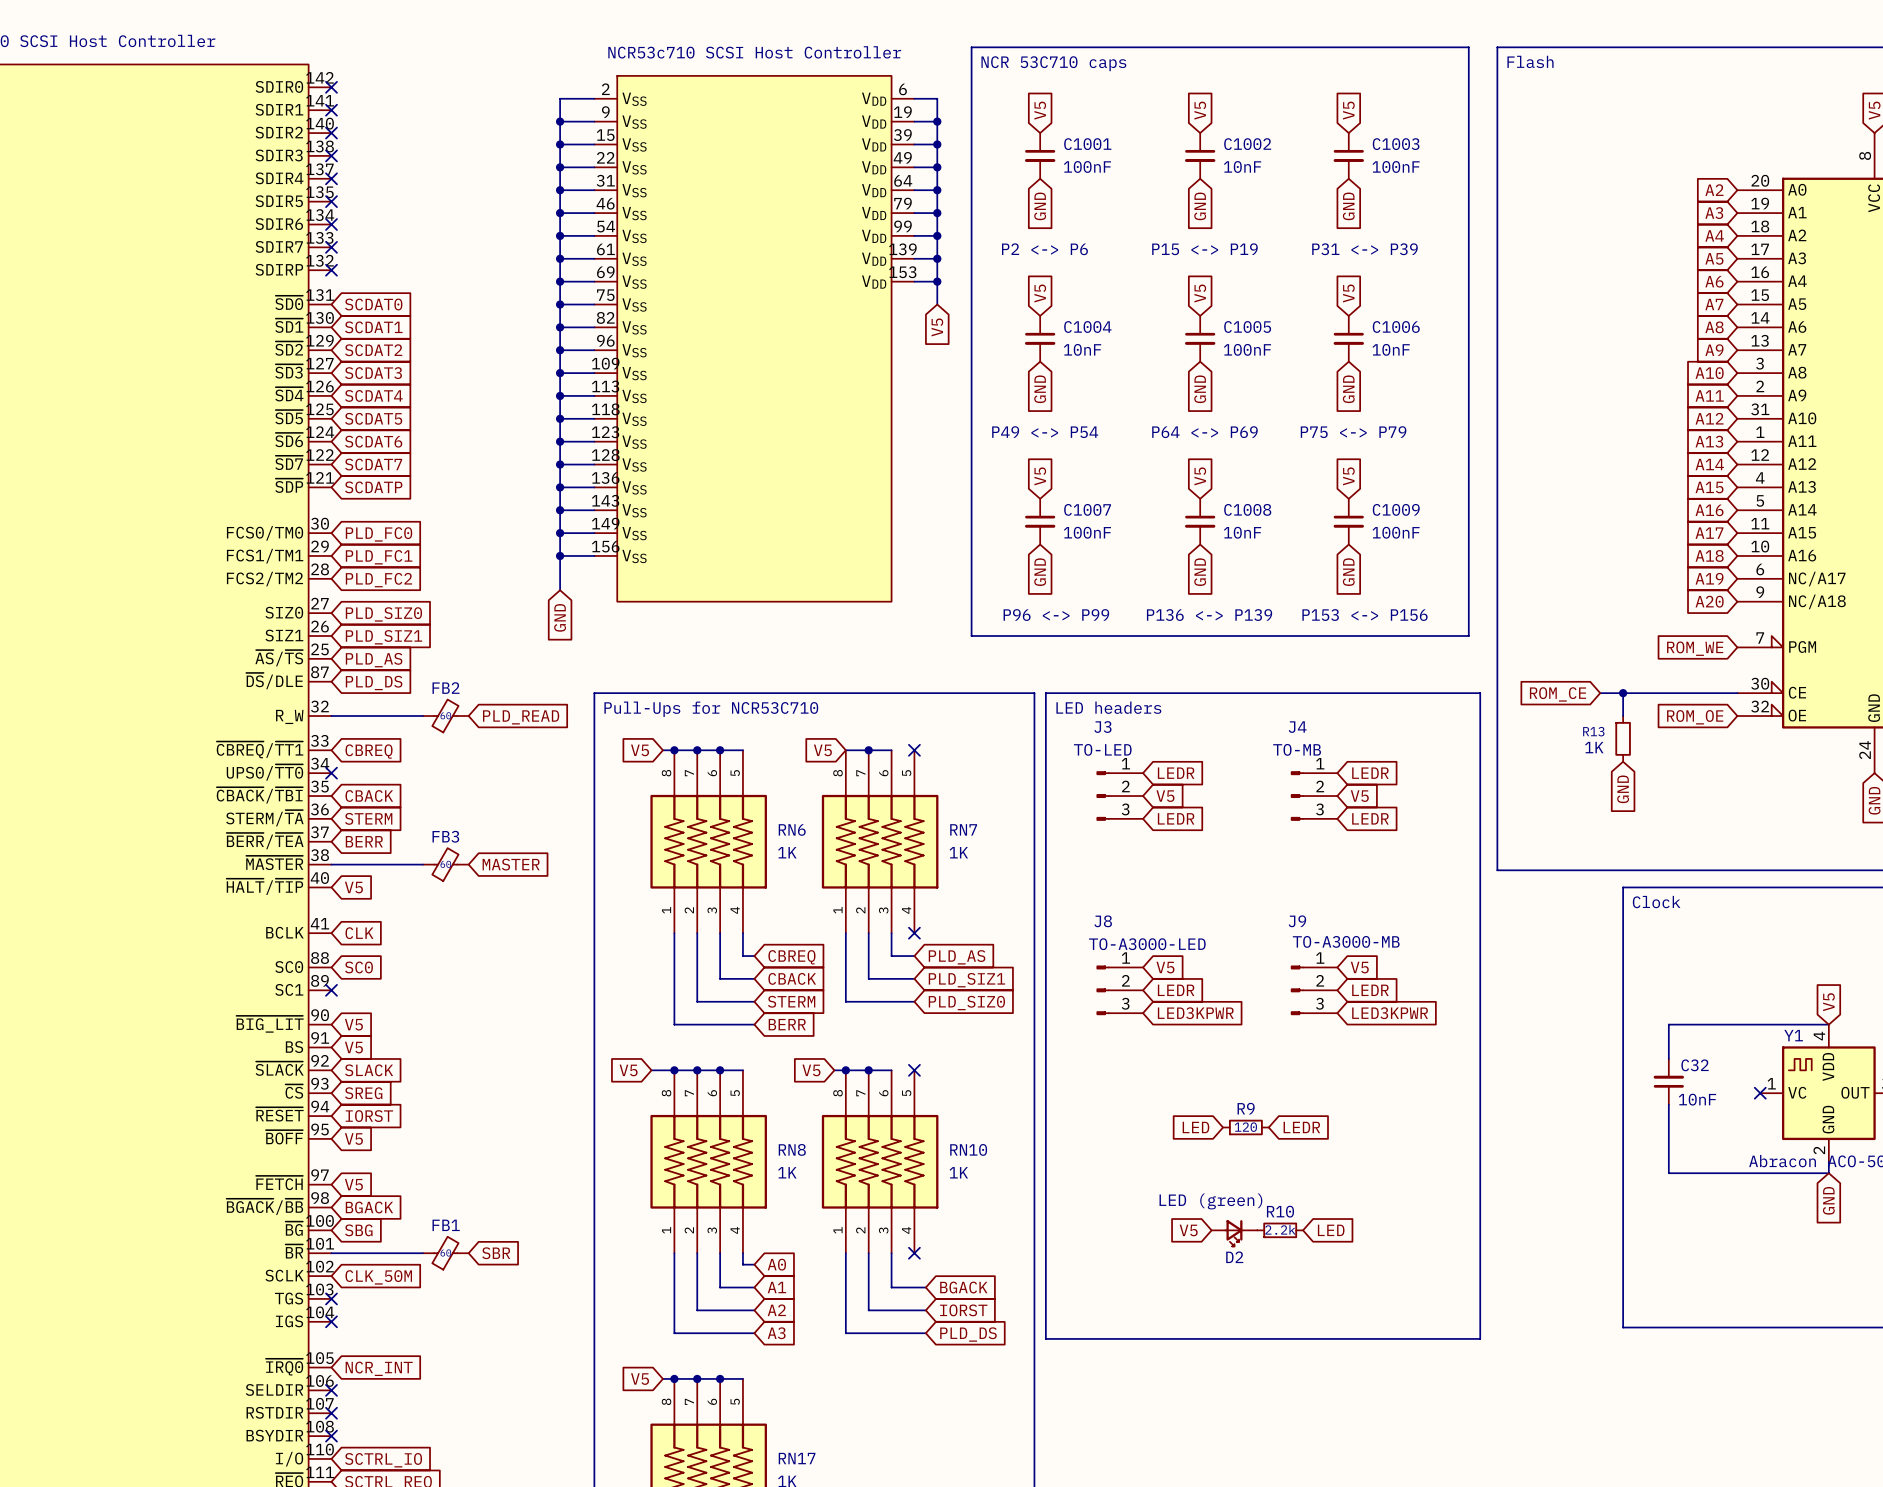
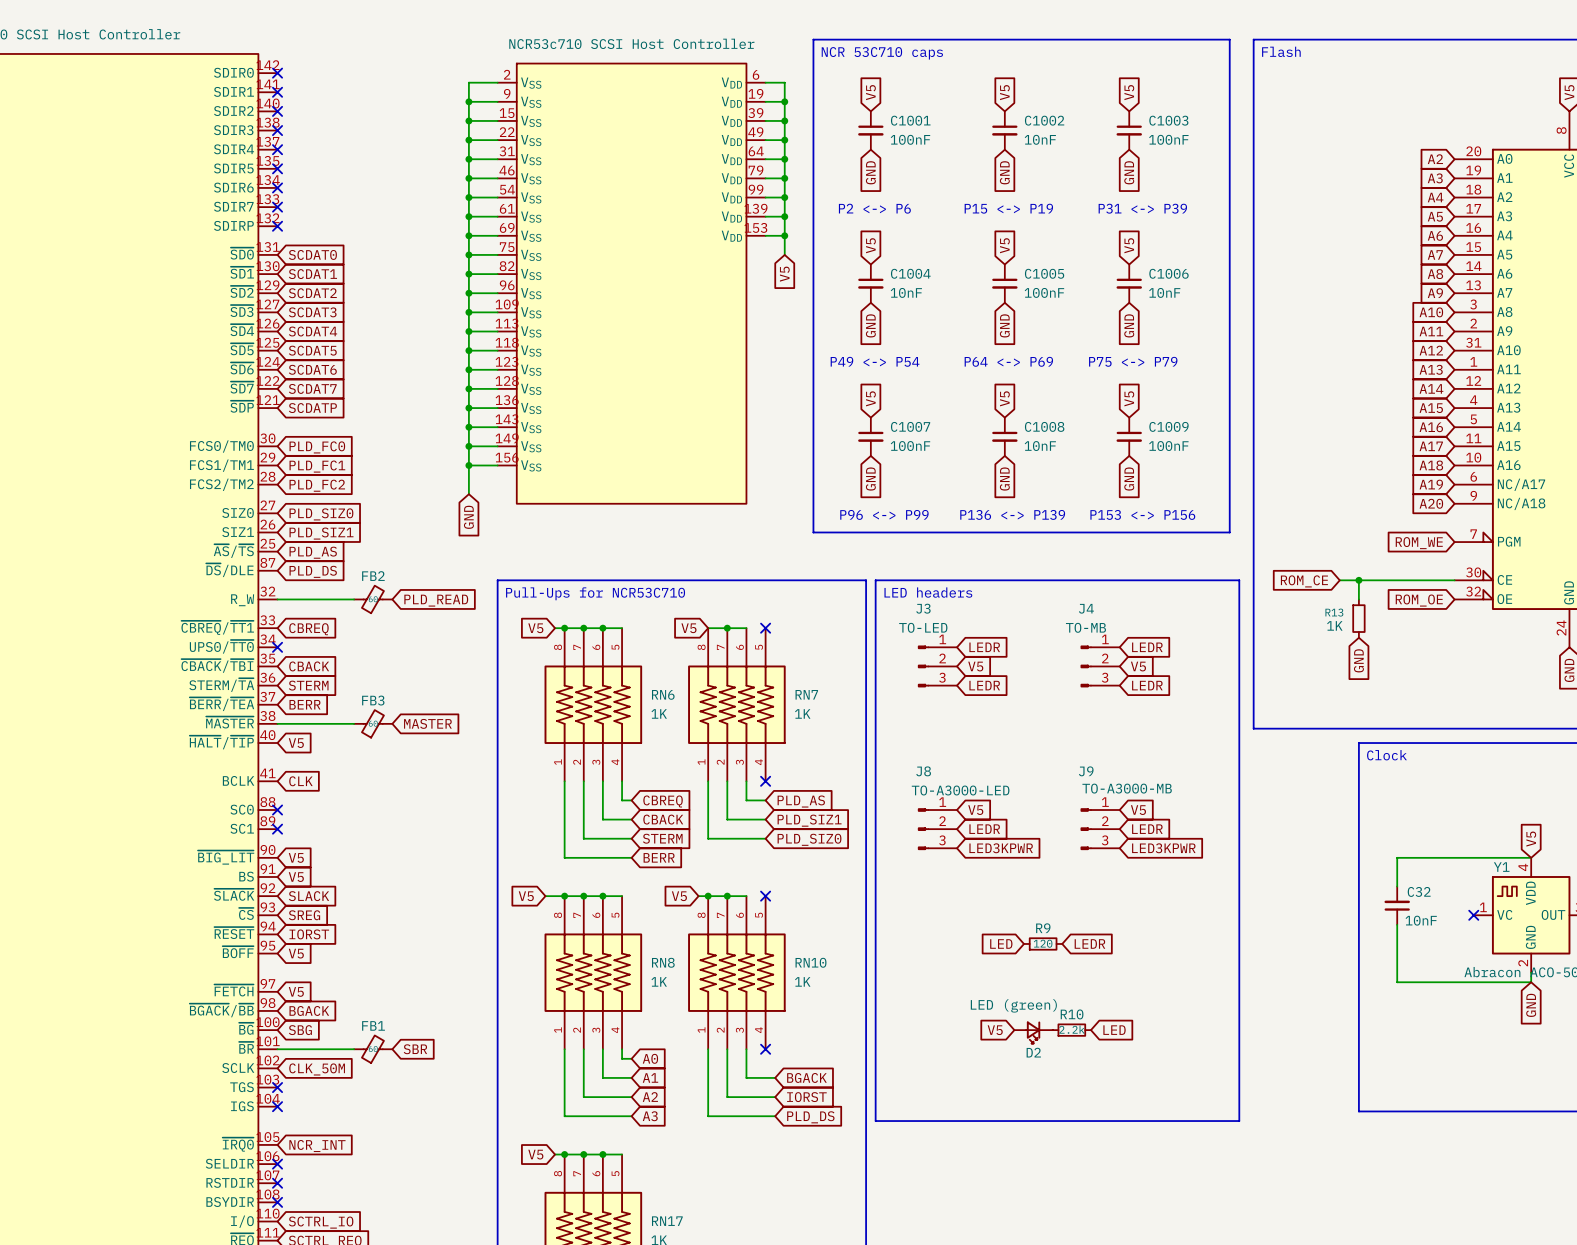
no-connect mark: none -> (277, 810)
global label: SC0 (358, 967) -> none

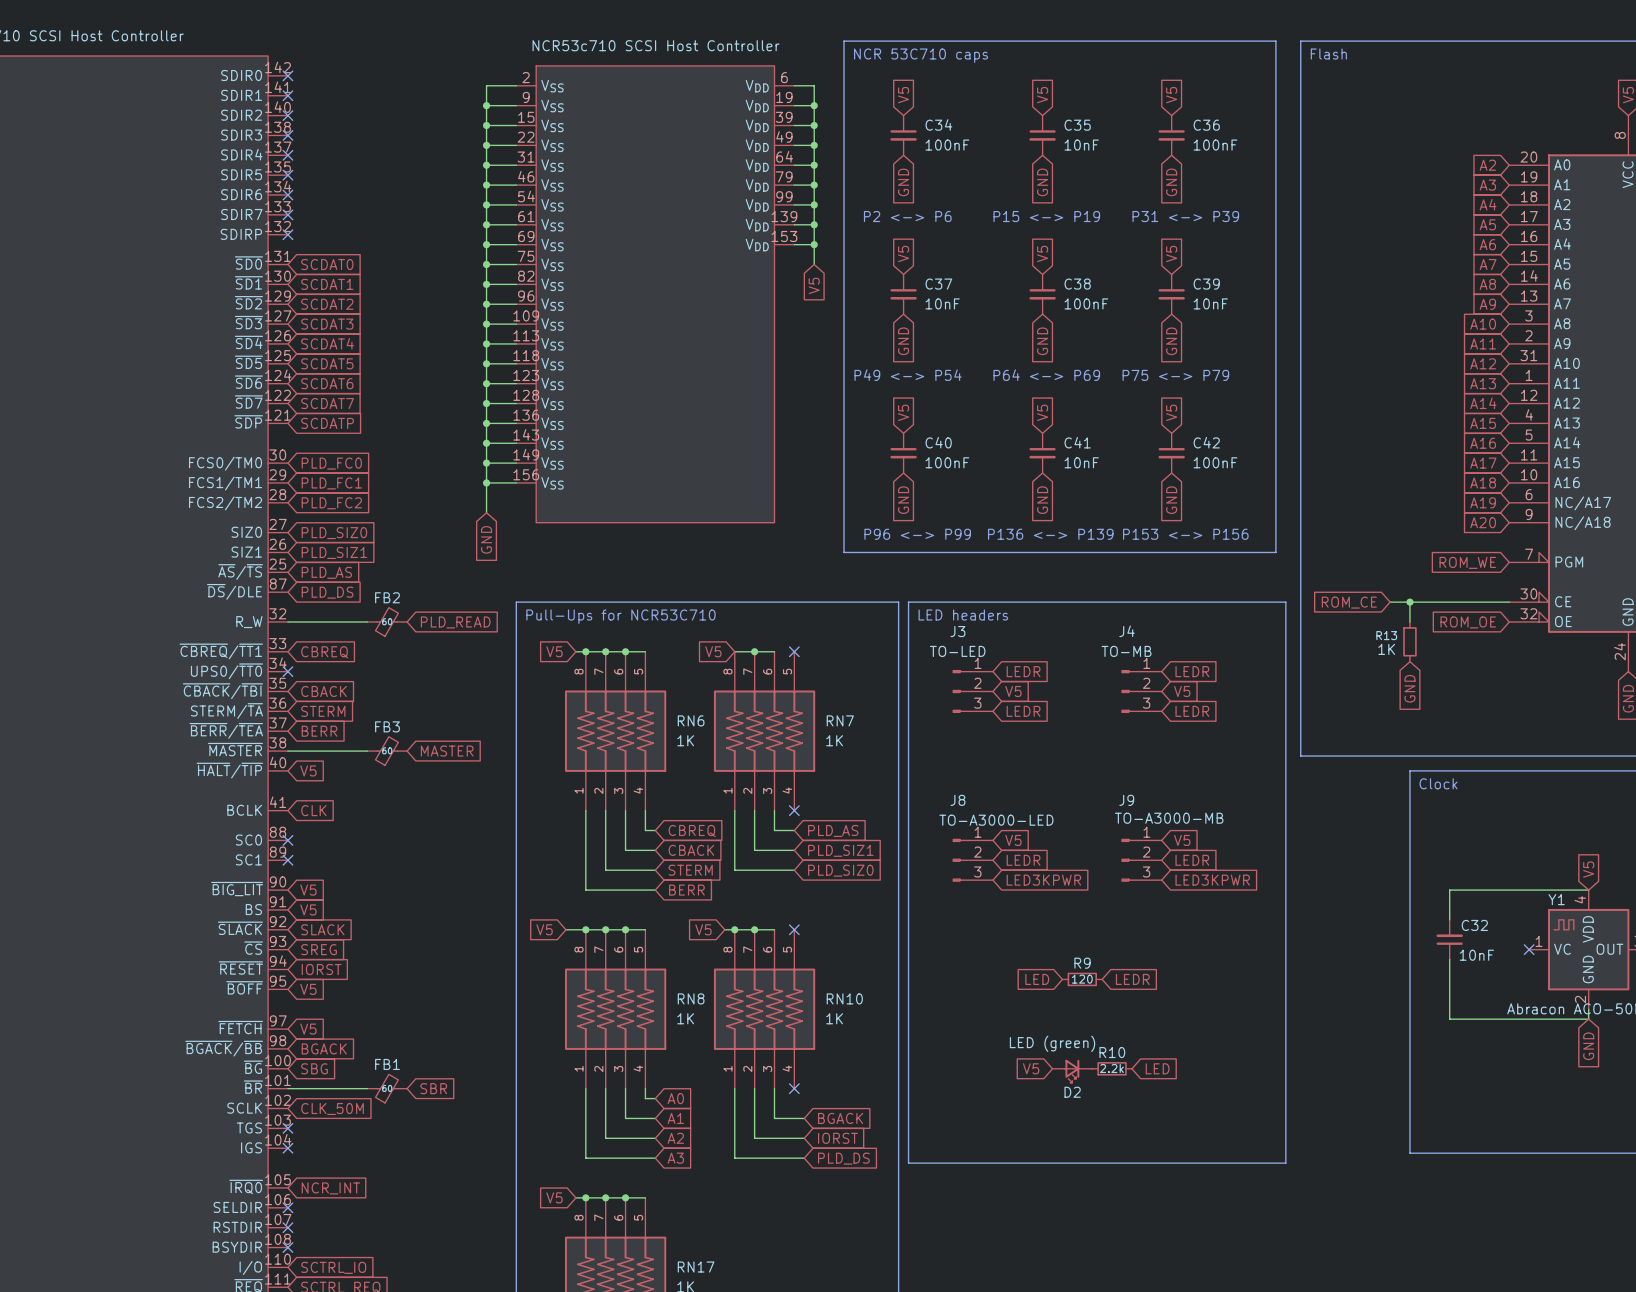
C1001 name: C1001 (910, 120) -> C34 (938, 124)
C1002 name: C1002 (1044, 120) -> C35 (1077, 125)
C1003 name: C1003 (1168, 120) -> C36 (1206, 125)
C1004 name: C1004 (910, 273) -> C37 (938, 284)
C1005 name: C1005 (1044, 273) -> C38 (1077, 284)
C1006 name: C1006 (1168, 273) -> C39 (1206, 284)
C1007 name: C1007 (910, 426) -> C40 (938, 442)
C1008 name: C1008 (1044, 426) -> C41 (1077, 442)
C1009 name: C1009 (1168, 426) -> C42 (1206, 442)

